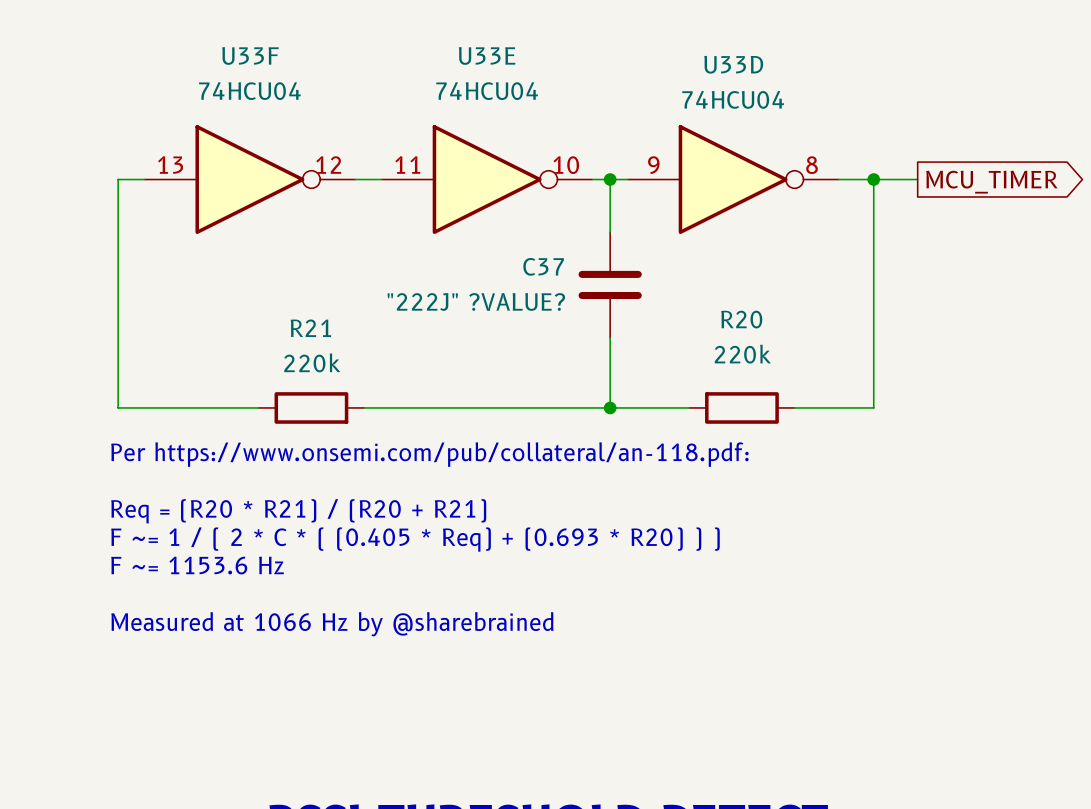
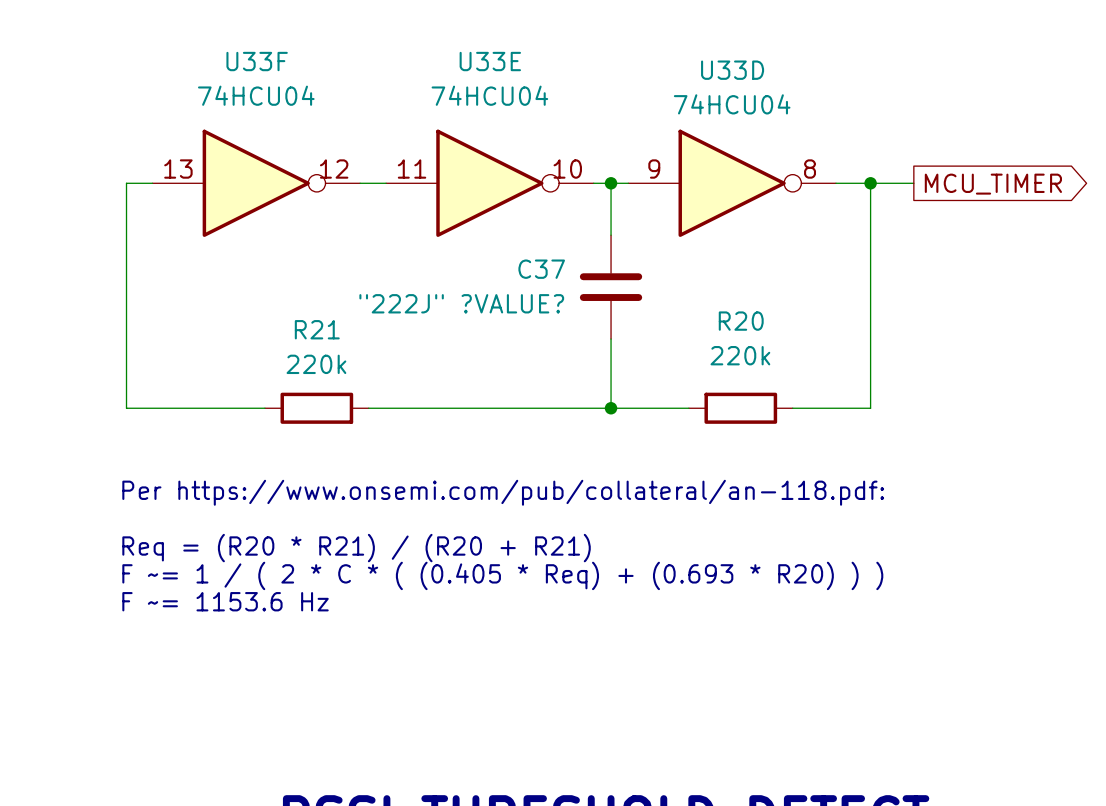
text position: Per https://www.onsemi.com/pub/collateral/an-118.pdf: (429, 454) -> Per https://www.onsemi.com/pub/collateral/an-118.pdf: (503, 492)
text position: Req = (R20 * R21) / (R20 + R21) (298, 511) -> Req = (R20 * R21) / (R20 + R21) (356, 548)
text position: F ~= 1 / ( 2 * C * ( (0.405 * Req) + (0.693 * R20) ) ) (415, 539) -> F ~= 1 / ( 2 * C * ( (0.405 * Req) + (0.693 * R20) ) ) (502, 575)
text position: F ~= 1153.6 Hz (197, 565) -> F ~= 1153.6 Hz (225, 601)
text: Measured at 1066 Hz by @sharebrained (332, 624) -> none

